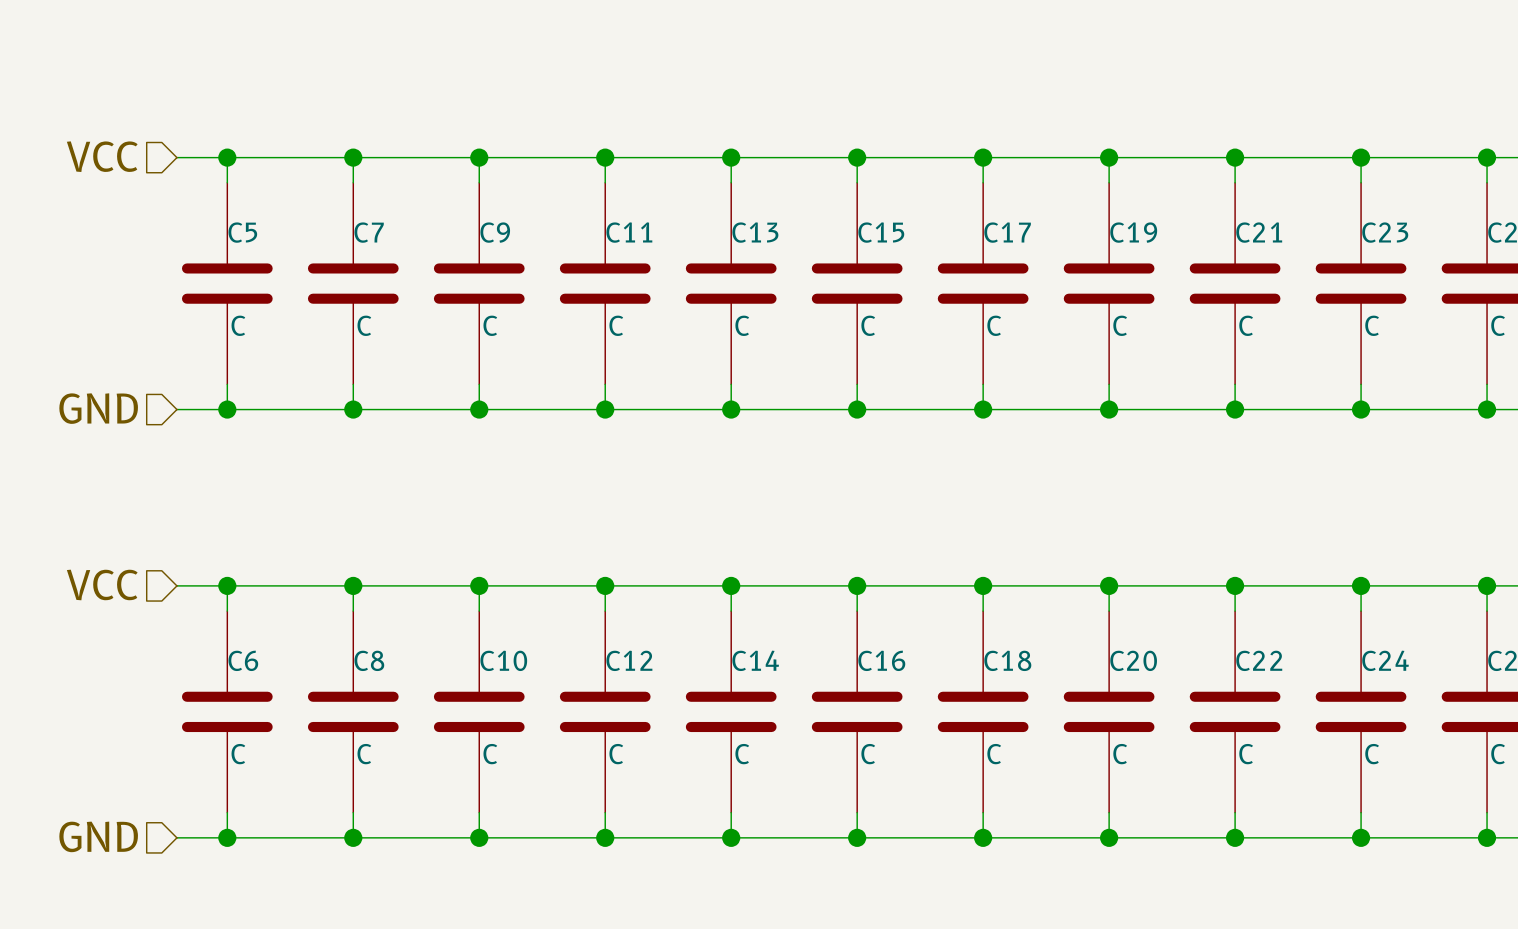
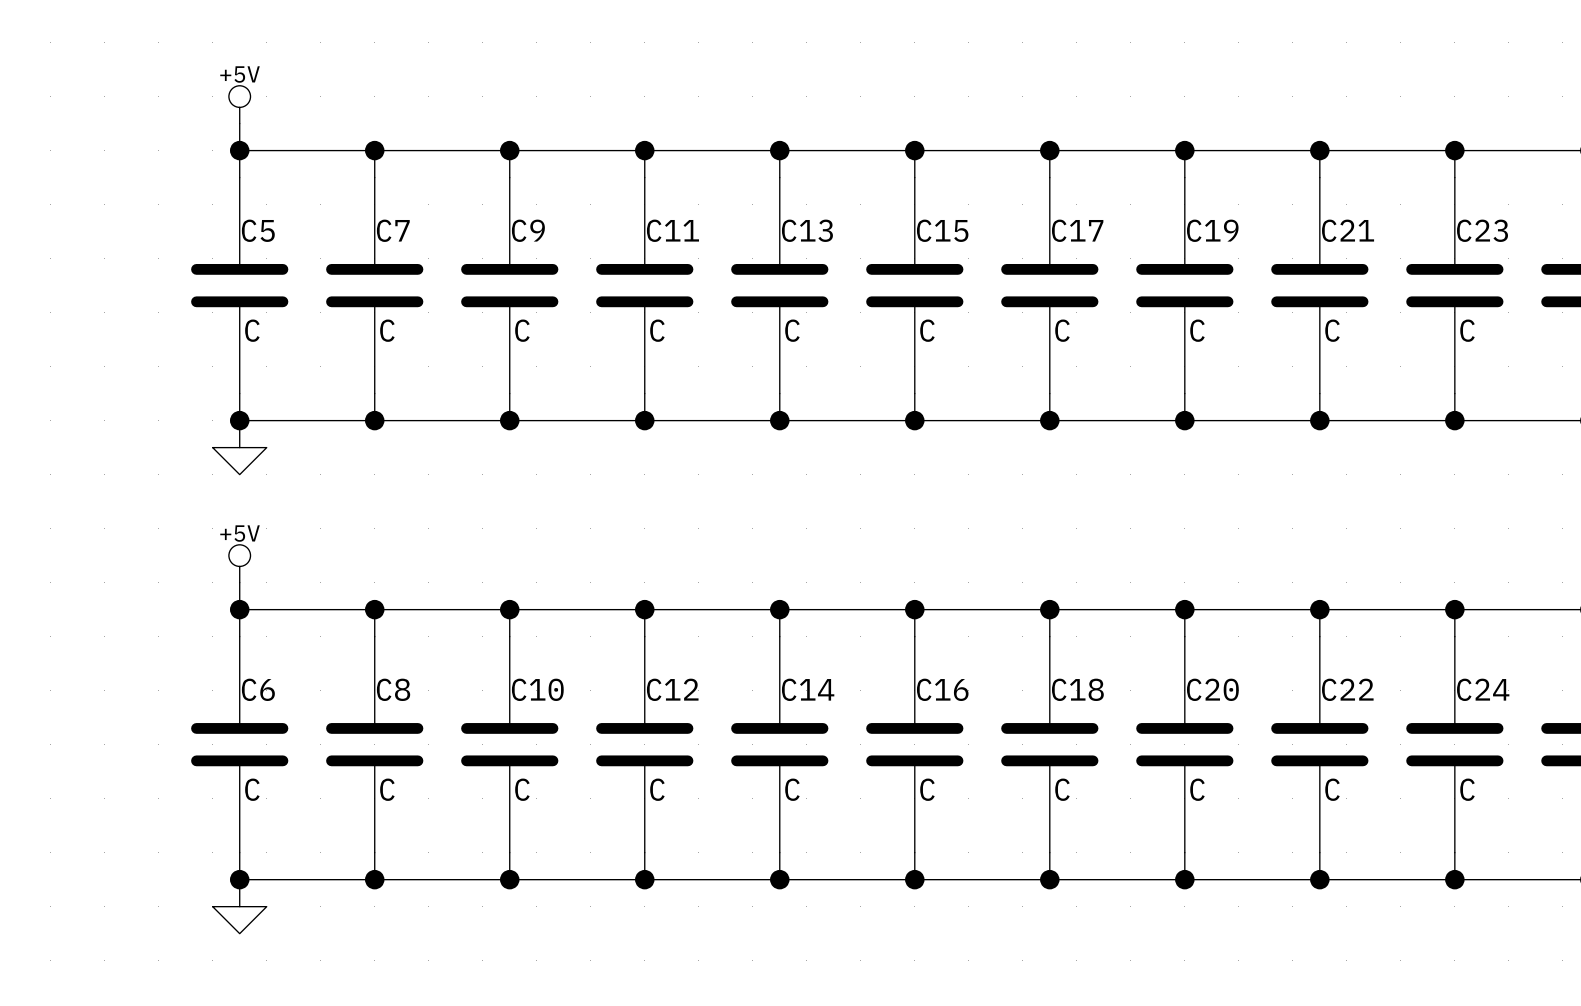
power symbol: none -> +5V (239, 104)
hierarchical label: VCC (102, 156) -> none
wire: (176, 157) (227, 157) -> (239, 123) (239, 150)
hierarchical label: GND (98, 408) -> none
wire: (176, 409) (227, 409) -> (239, 447) (239, 420)
power symbol: none -> (239, 461)
power symbol: none -> +5V (239, 563)
hierarchical label: VCC (102, 584) -> none
wire: (176, 585) (227, 585) -> (239, 582) (239, 609)
hierarchical label: GND (98, 836) -> none
wire: (176, 837) (227, 837) -> (239, 906) (239, 879)
power symbol: none -> (239, 920)

